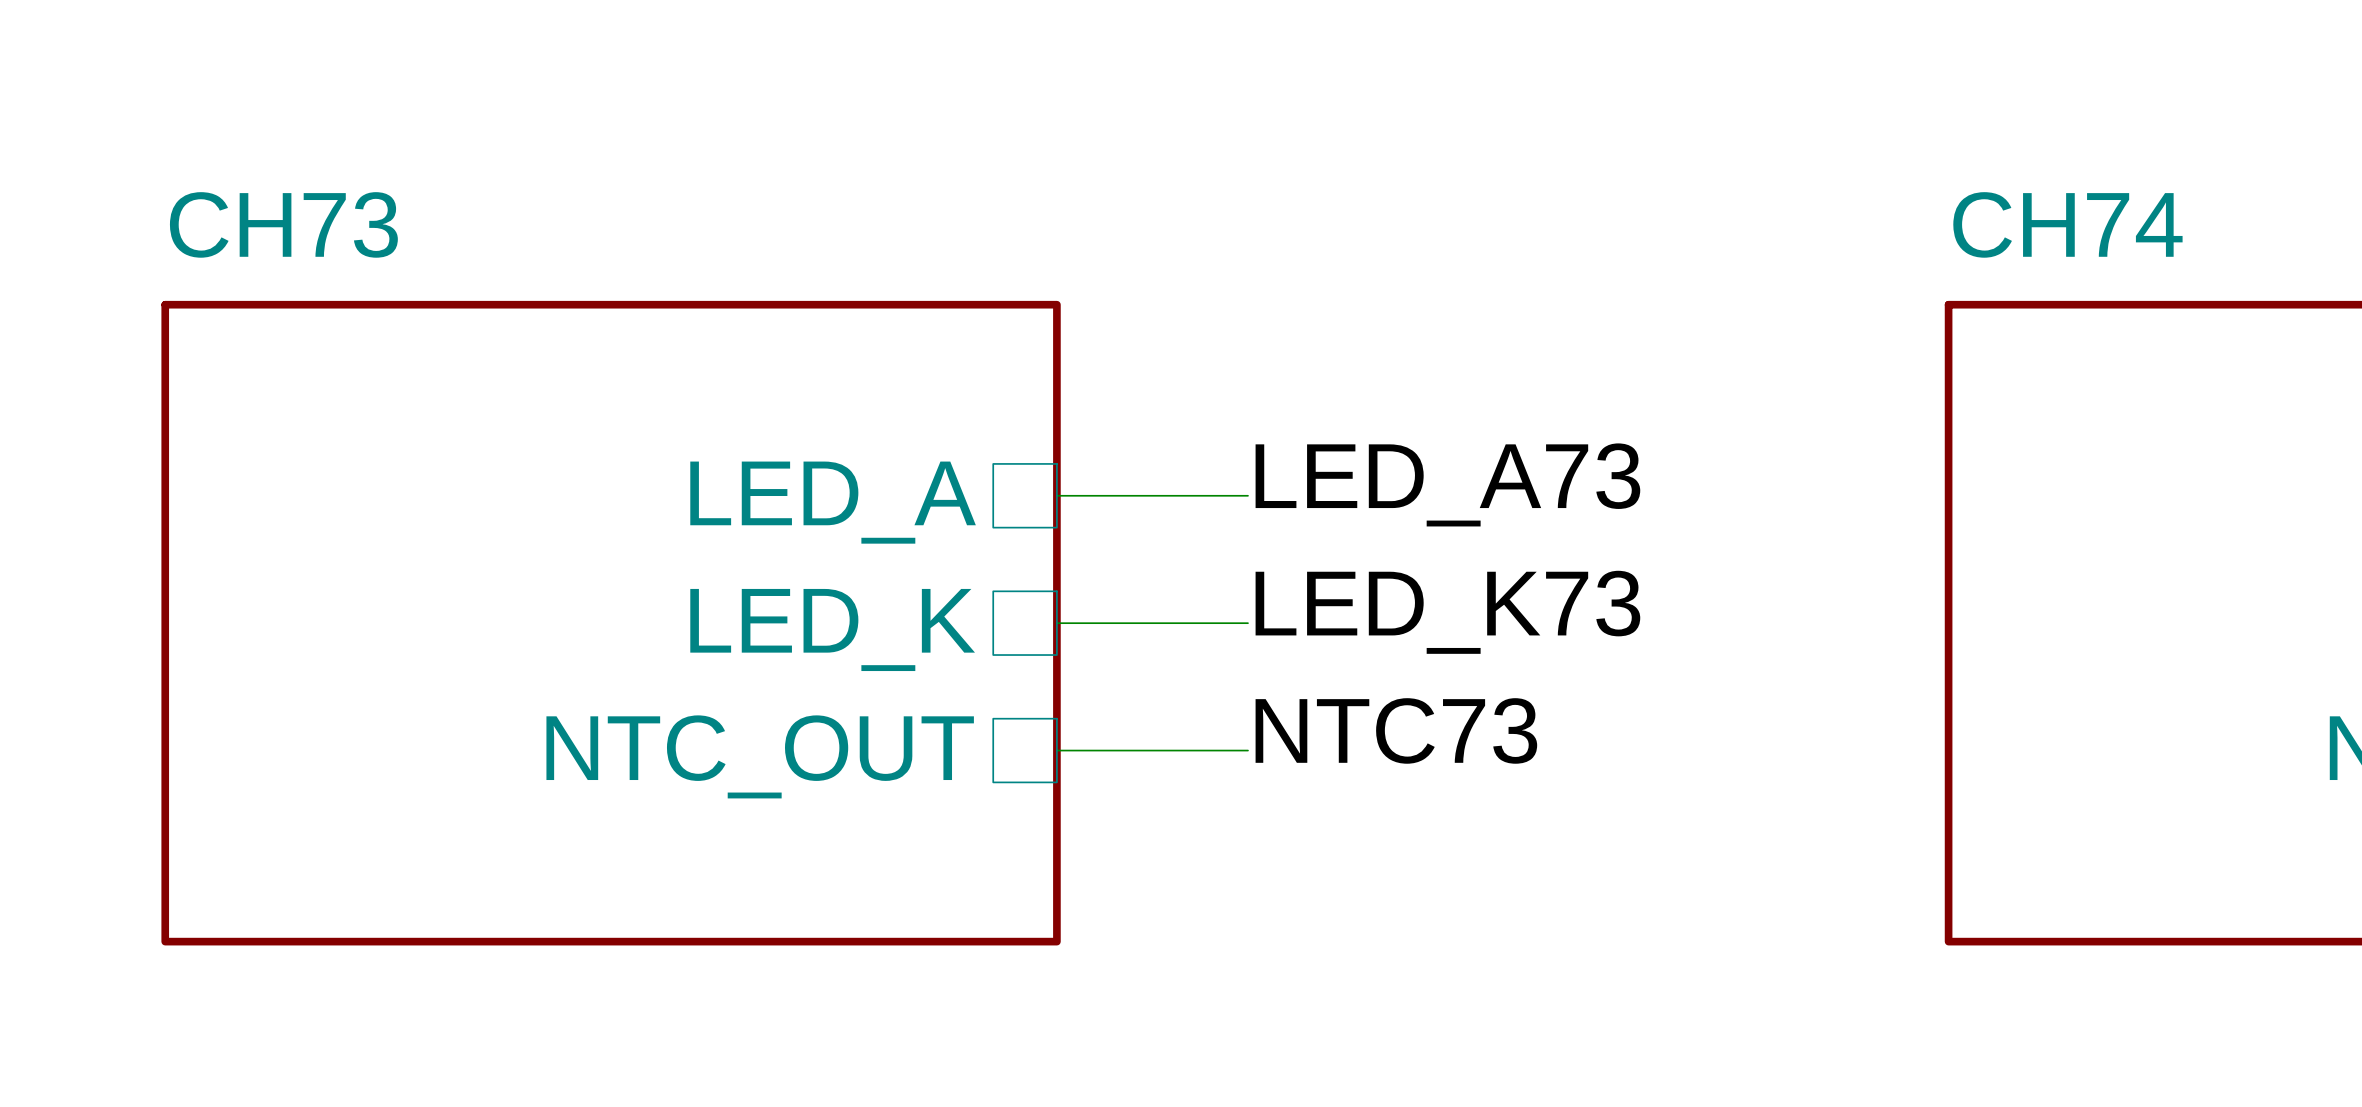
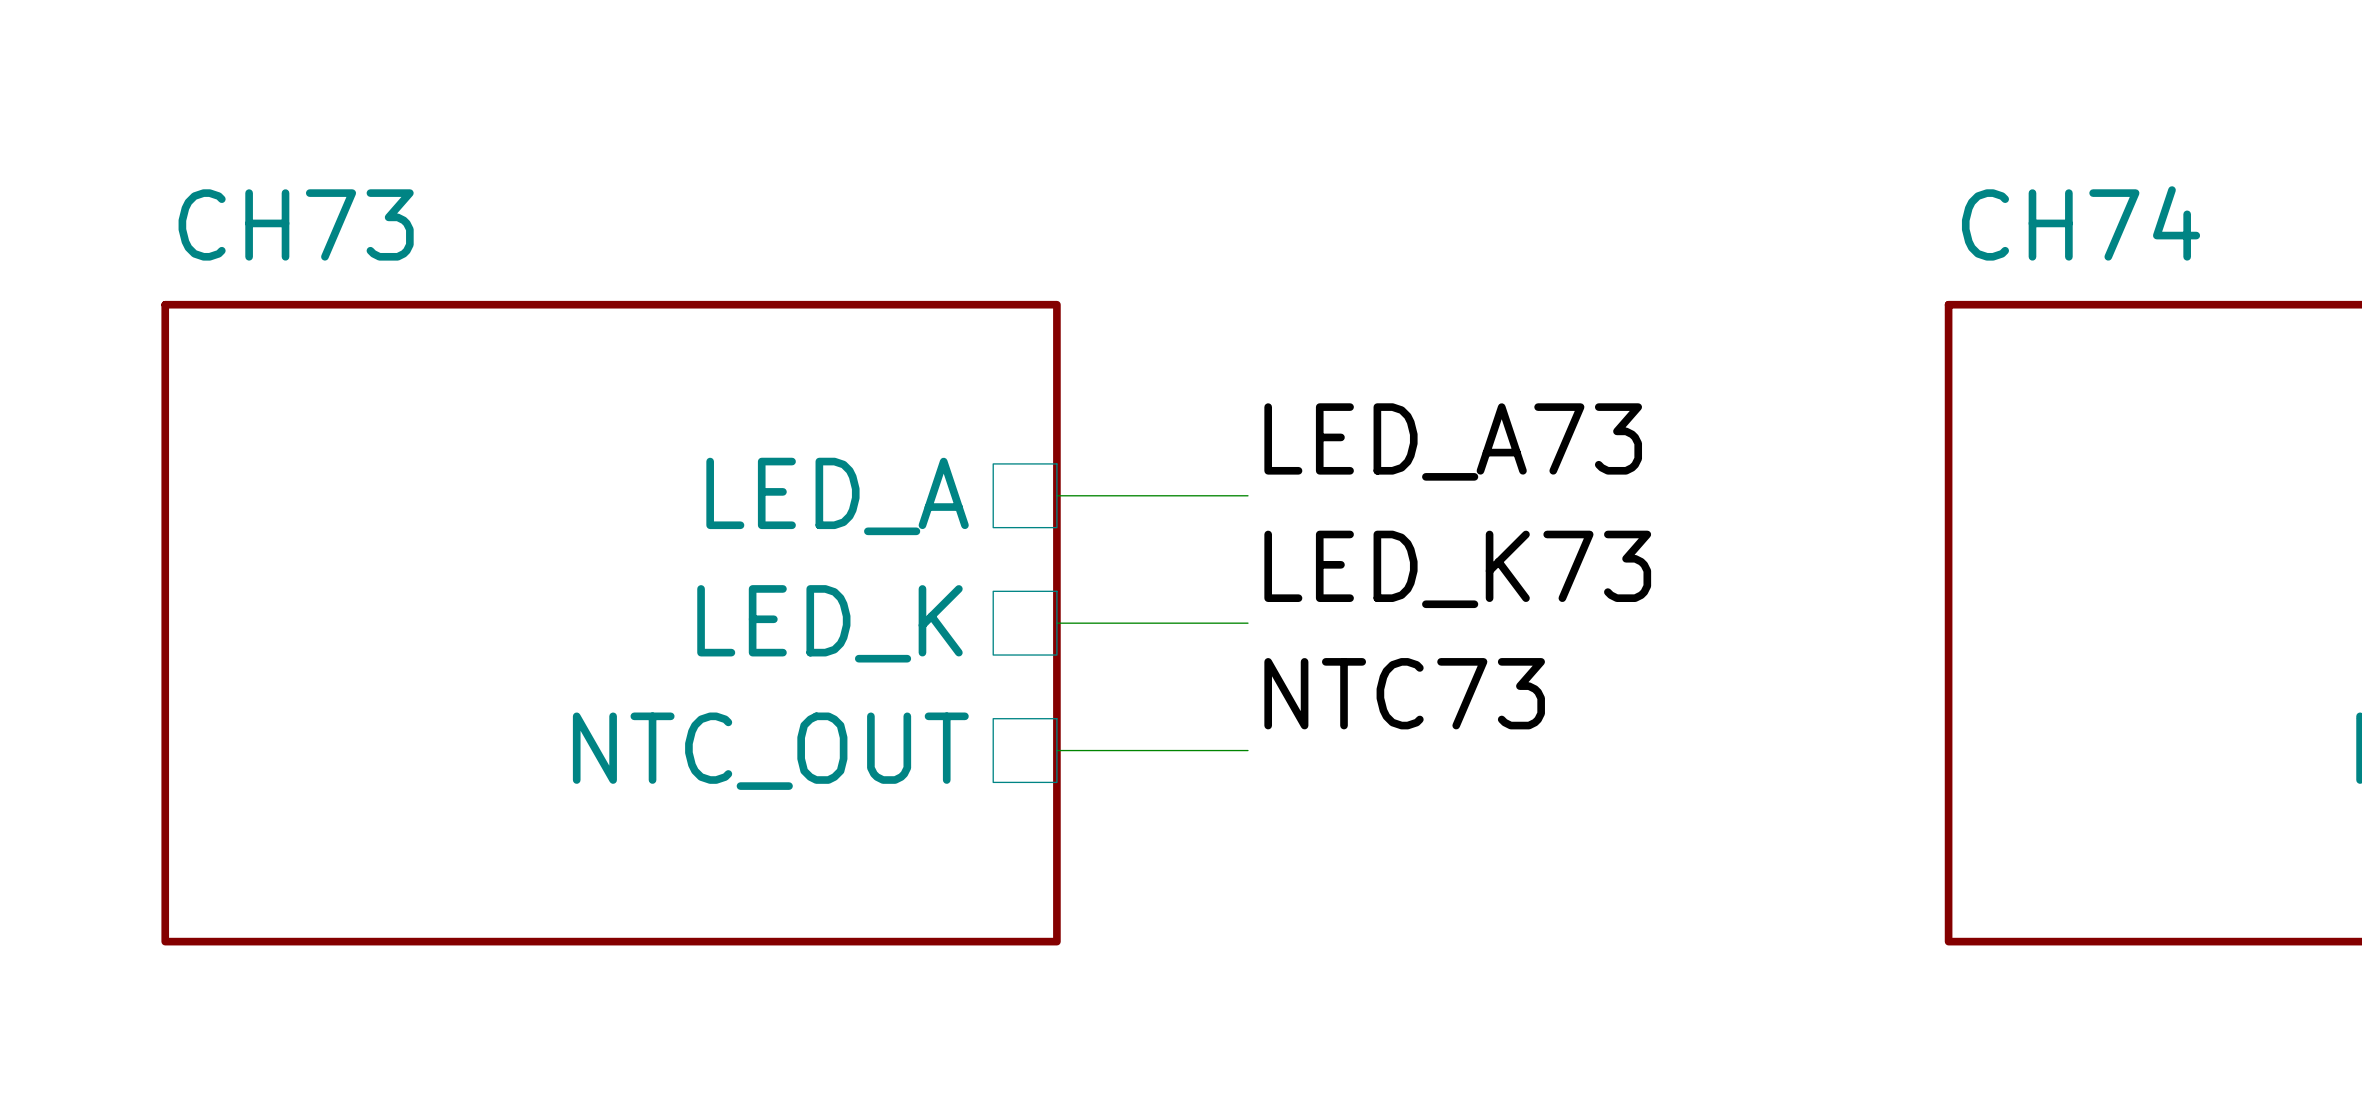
label position: LED_A73 (1447, 484) -> LED_A73 (1453, 441)
label position: LED_K73 (1447, 612) -> LED_K73 (1457, 569)
label position: NTC73 (1396, 730) -> NTC73 (1404, 693)

